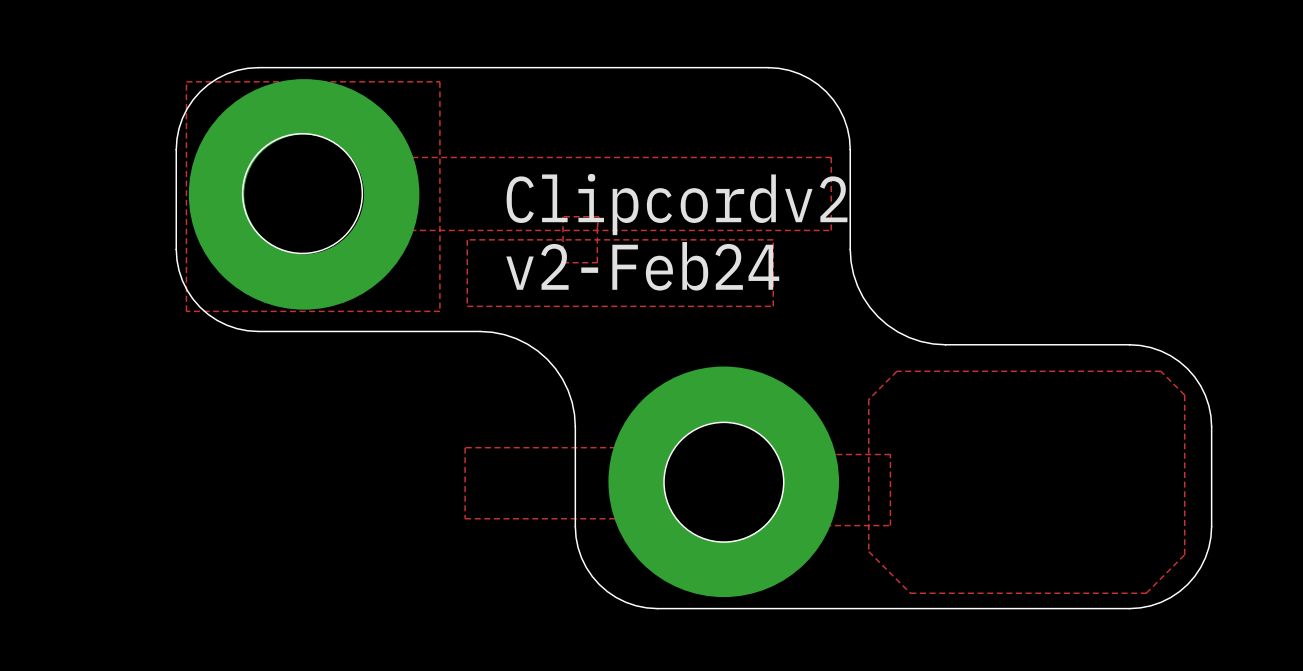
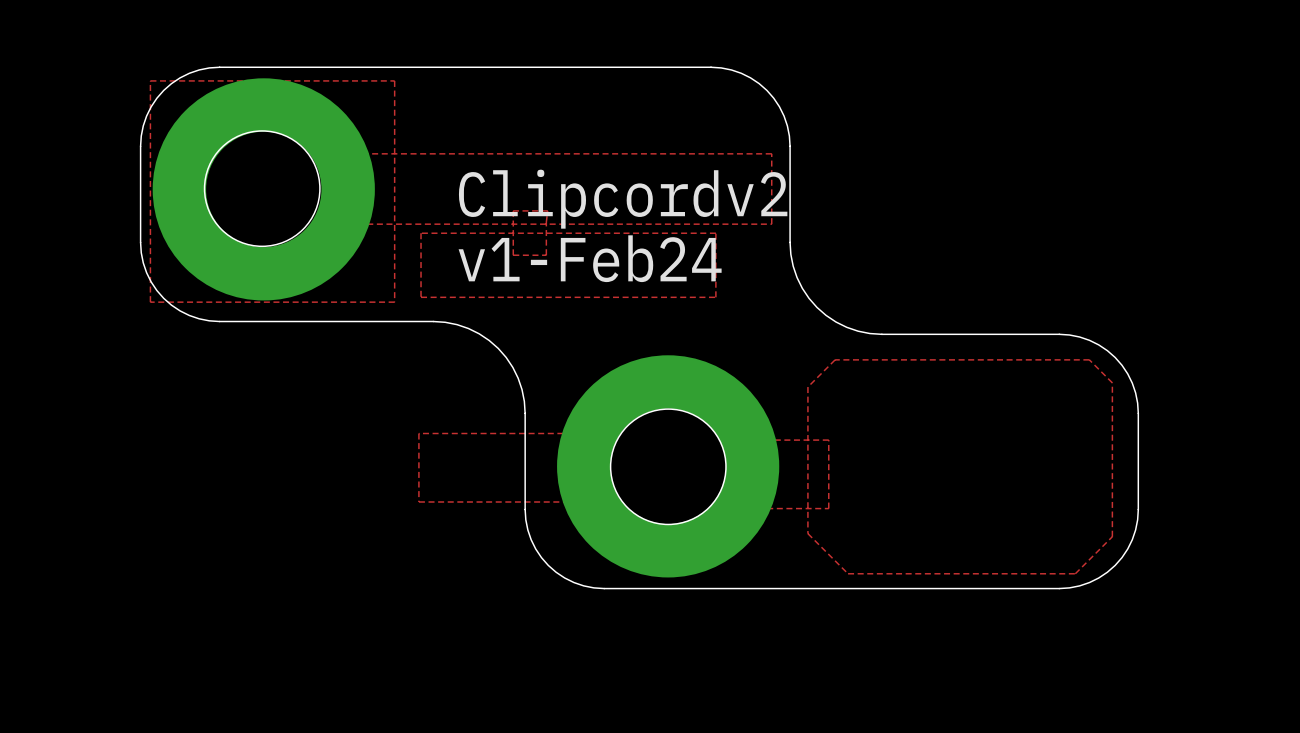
text: v2-Feb24 (642, 266) -> v1-Feb24 (590, 258)

